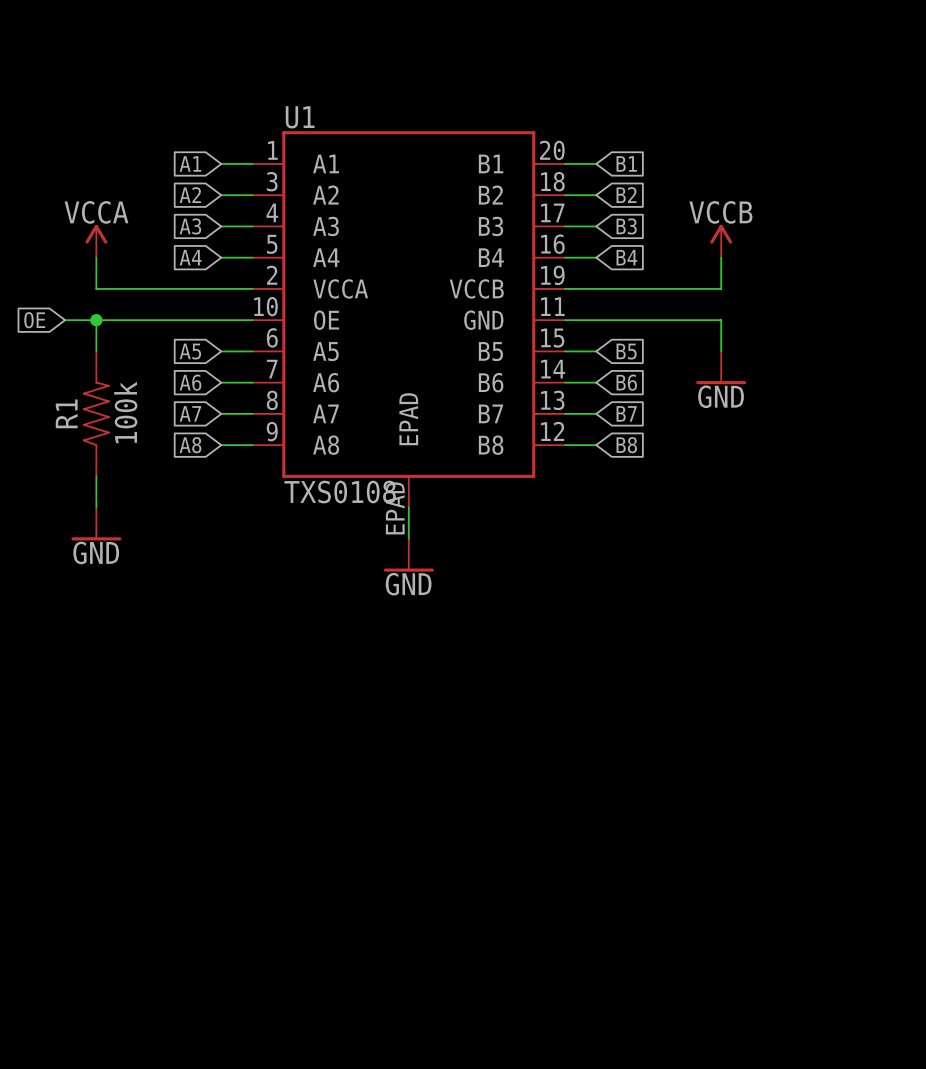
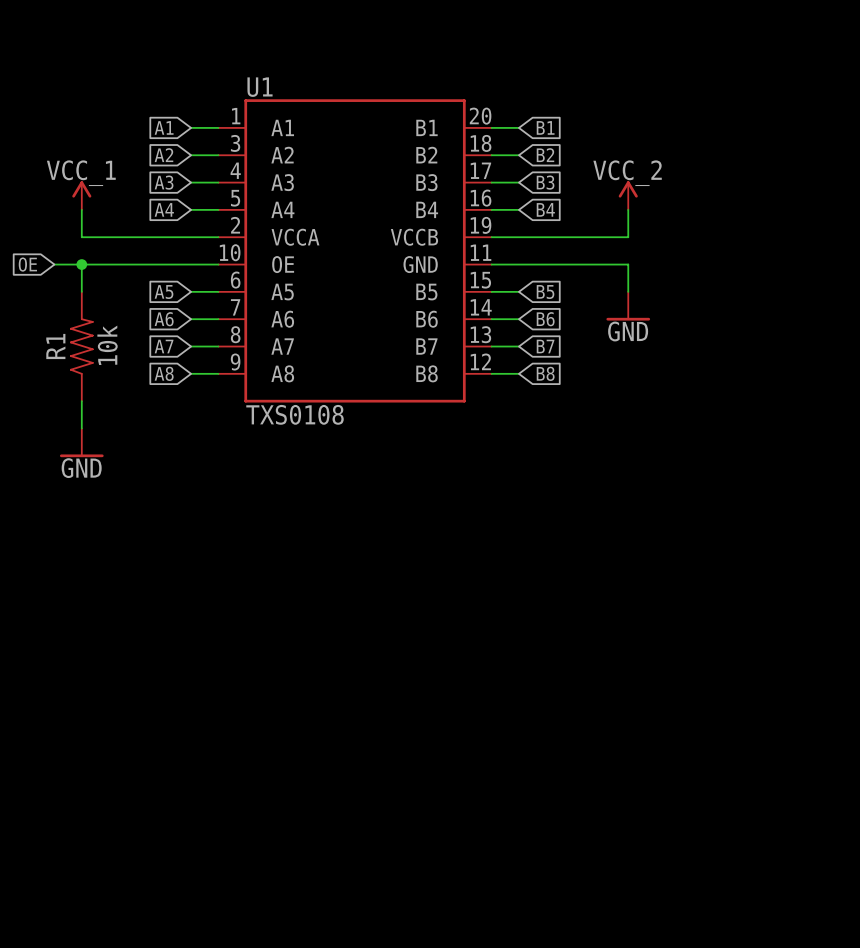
U1 symbol: [252, 131, 565, 508] -> [218, 99, 492, 403]
power symbol: VCCA (96, 241) -> VCC_1 (81, 195)
power symbol: VCCB (721, 241) -> VCC_2 (628, 195)
R1 value: 100k (125, 412) -> 10k (107, 345)
wire: (408, 507) (408, 538) -> none
power symbol: GND (408, 555) -> none

